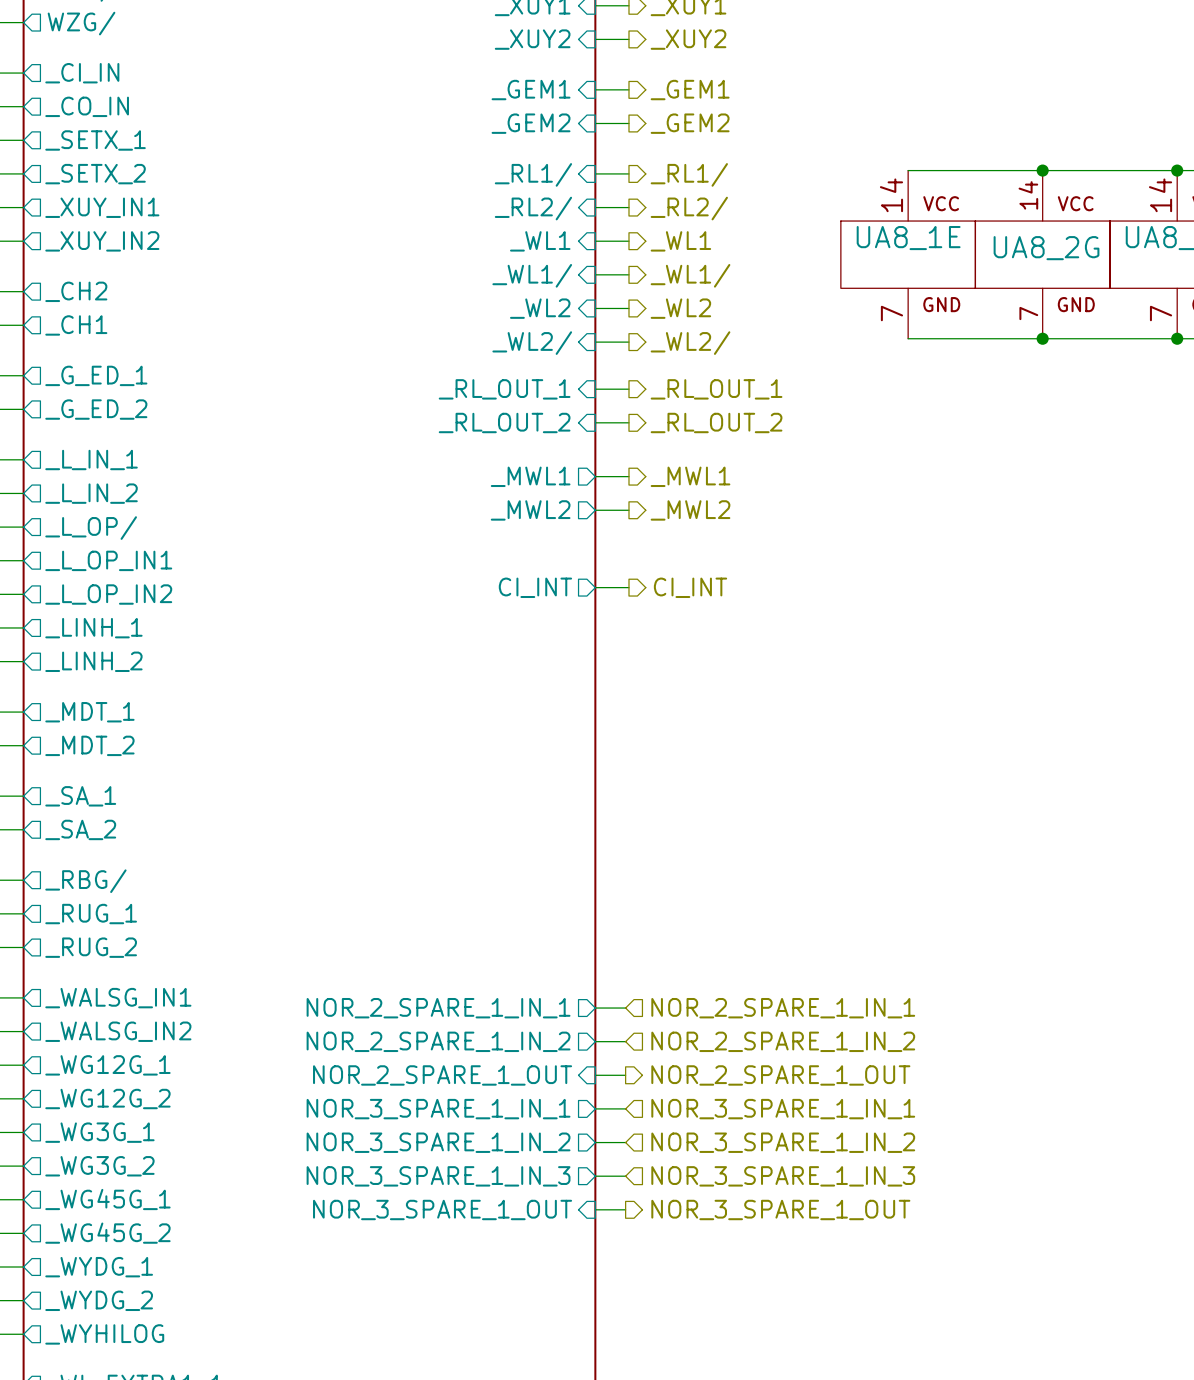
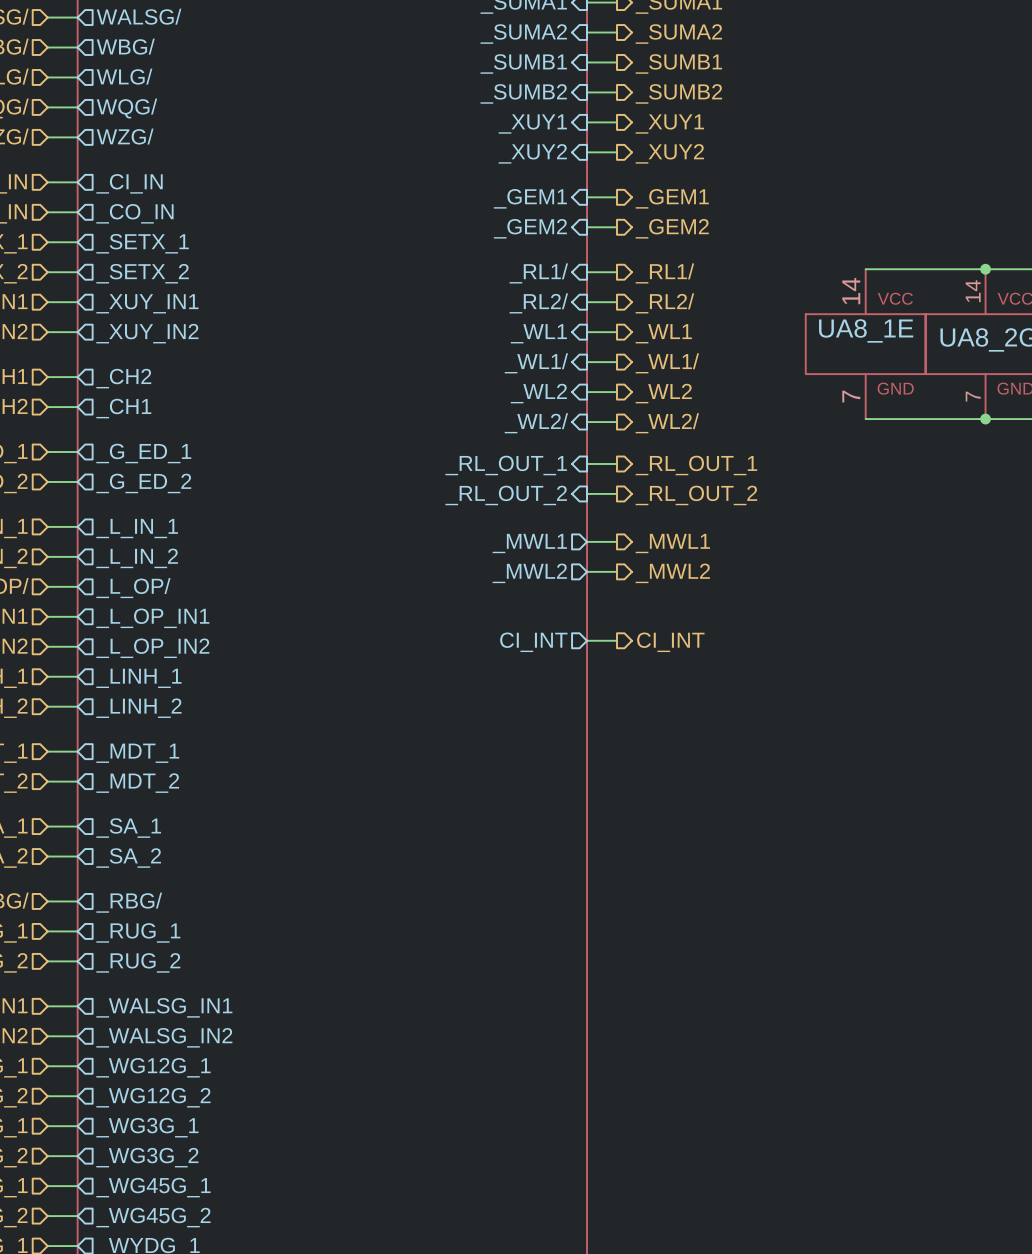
sheet pin: NOR_2_SPARE_1_IN_1 (438, 1008) -> none
wire: (595, 1008) (625, 1008) -> none
hierarchical label: NOR_2_SPARE_1_IN_1 (783, 1008) -> none
sheet pin: NOR_2_SPARE_1_IN_2 (438, 1041) -> none
wire: (595, 1041) (625, 1041) -> none
hierarchical label: NOR_2_SPARE_1_IN_2 (783, 1041) -> none
sheet pin: NOR_2_SPARE_1_OUT (442, 1075) -> none
wire: (595, 1075) (625, 1075) -> none
hierarchical label: NOR_2_SPARE_1_OUT (780, 1075) -> none
wire: (595, 1108) (625, 1108) -> none
sheet pin: NOR_3_SPARE_1_IN_1 (438, 1109) -> none
hierarchical label: NOR_3_SPARE_1_IN_1 (783, 1109) -> none
sheet pin: NOR_3_SPARE_1_IN_2 (438, 1142) -> none
wire: (595, 1142) (625, 1142) -> none
hierarchical label: NOR_3_SPARE_1_IN_2 (783, 1142) -> none
sheet pin: NOR_3_SPARE_1_IN_3 (438, 1176) -> none
wire: (595, 1176) (625, 1176) -> none
hierarchical label: NOR_3_SPARE_1_IN_3 (783, 1176) -> none
sheet pin: NOR_3_SPARE_1_OUT (442, 1209) -> none
wire: (595, 1209) (625, 1209) -> none
hierarchical label: NOR_3_SPARE_1_OUT (780, 1209) -> none

